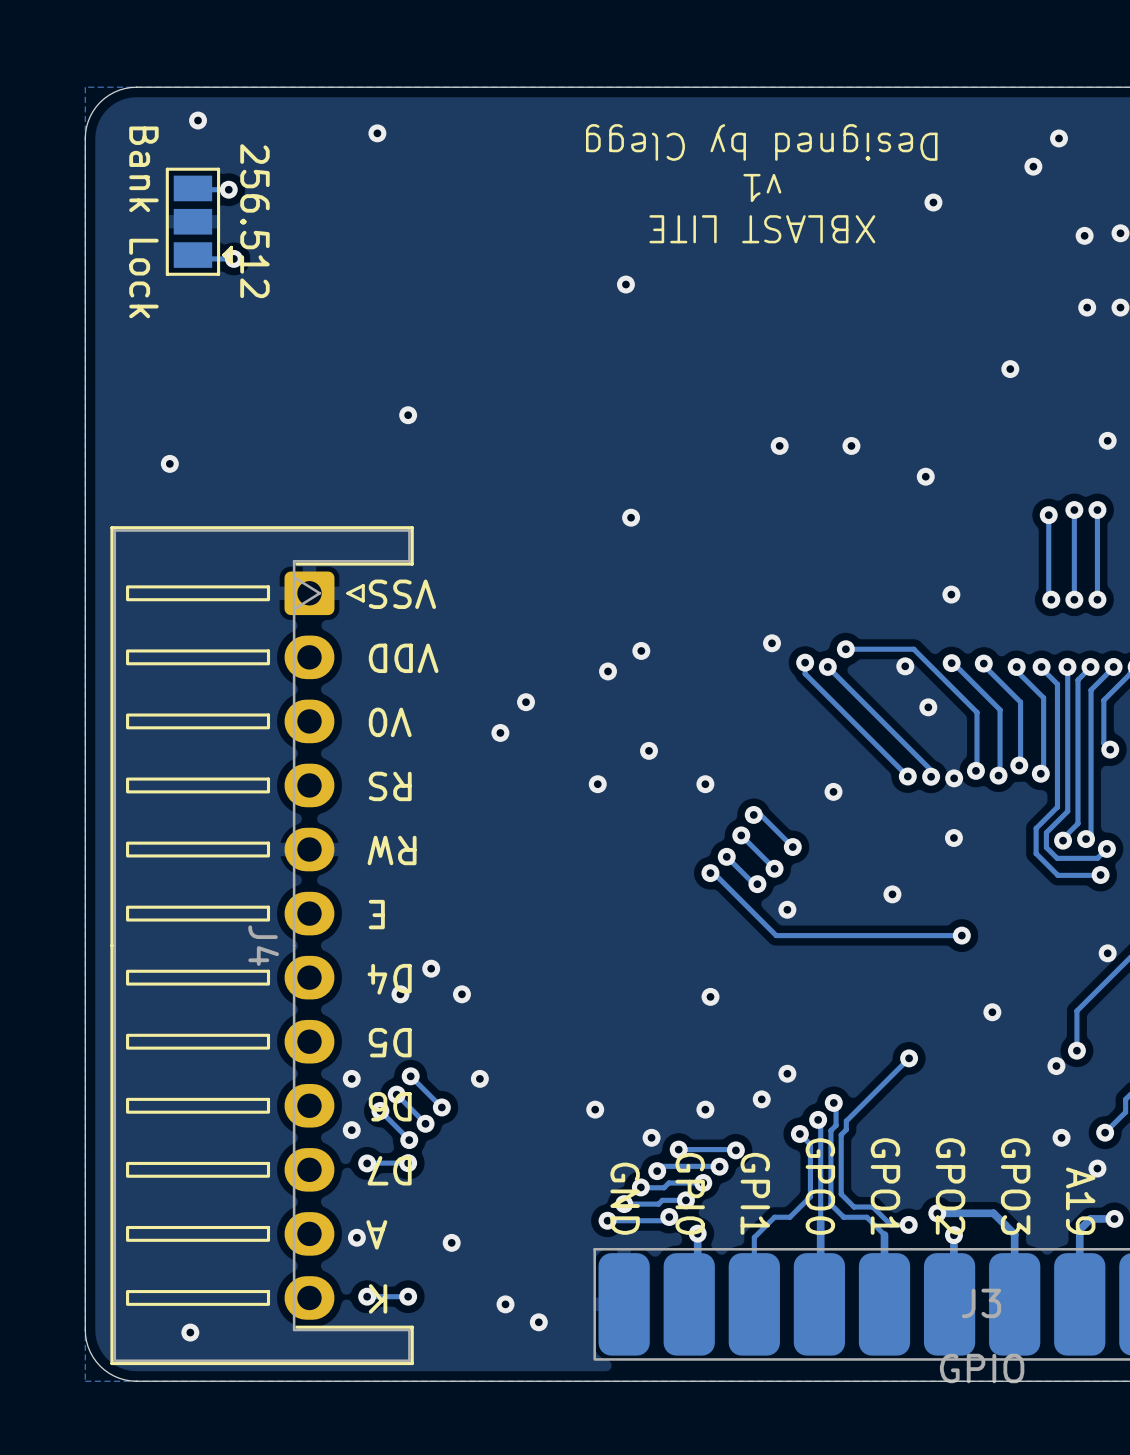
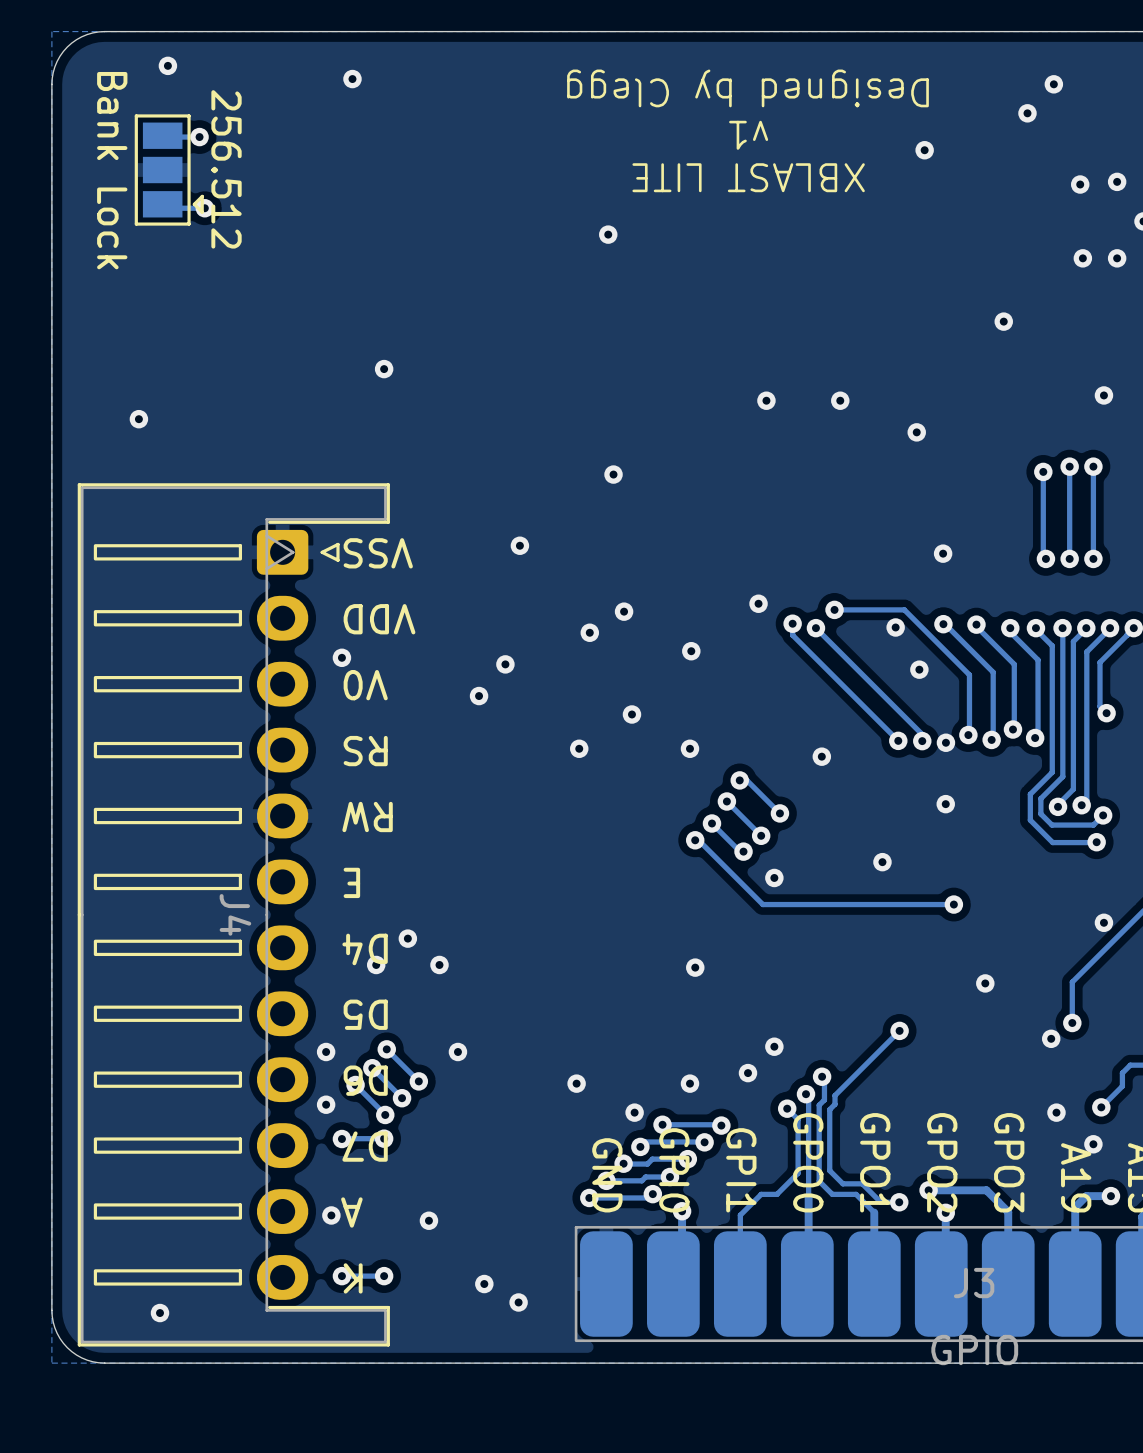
via: none -> (519, 545)
via: none -> (691, 651)
via: none -> (341, 657)

